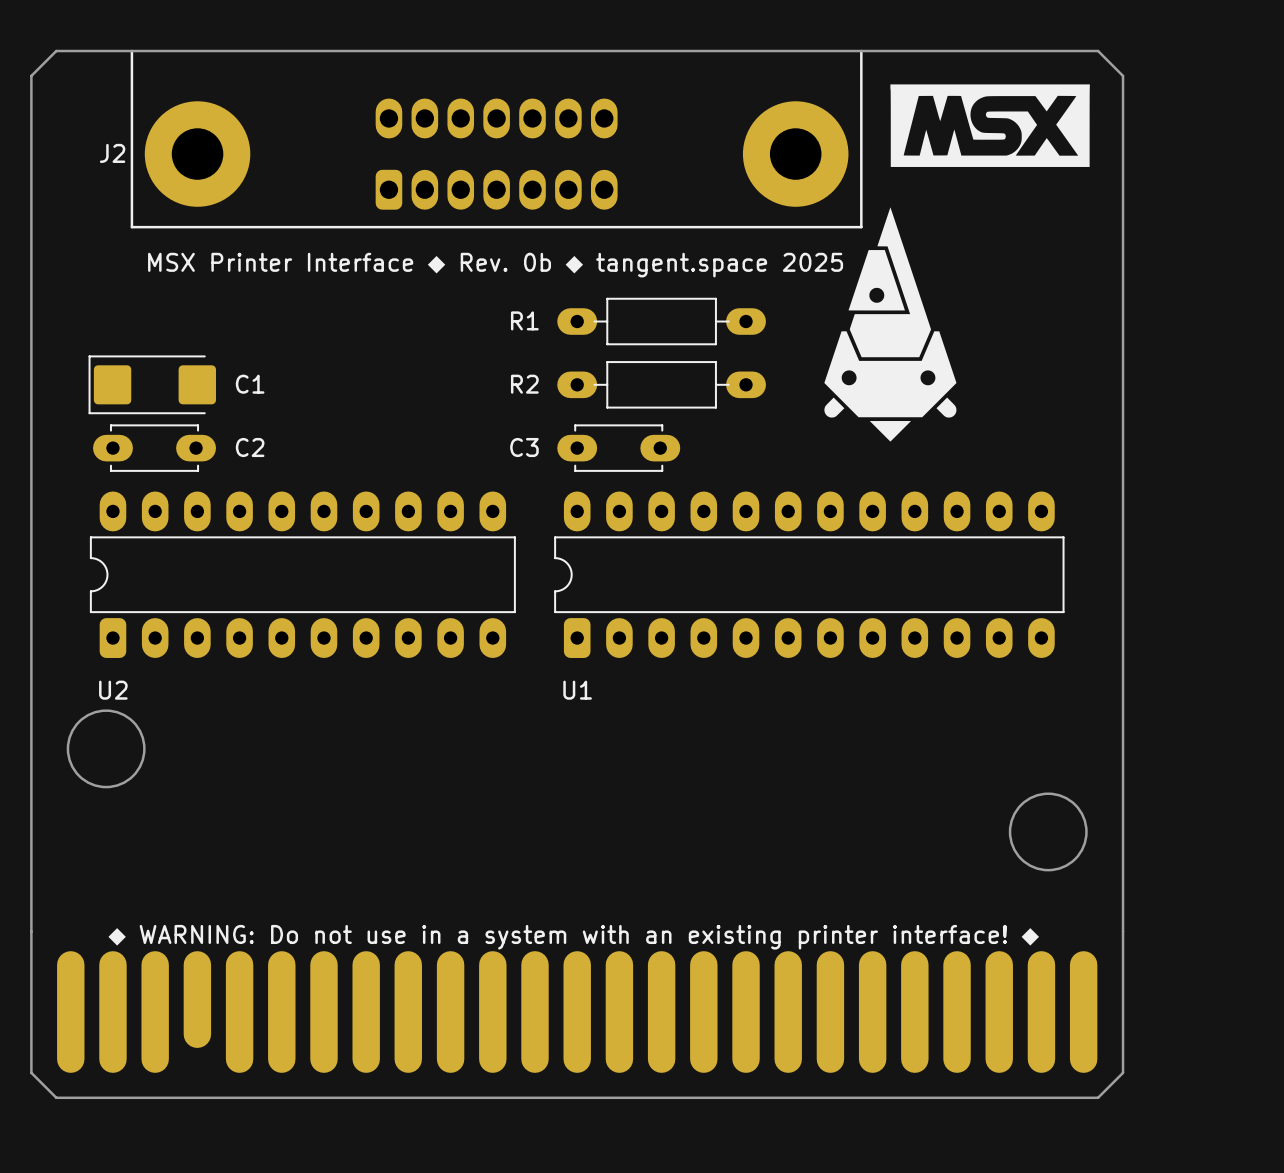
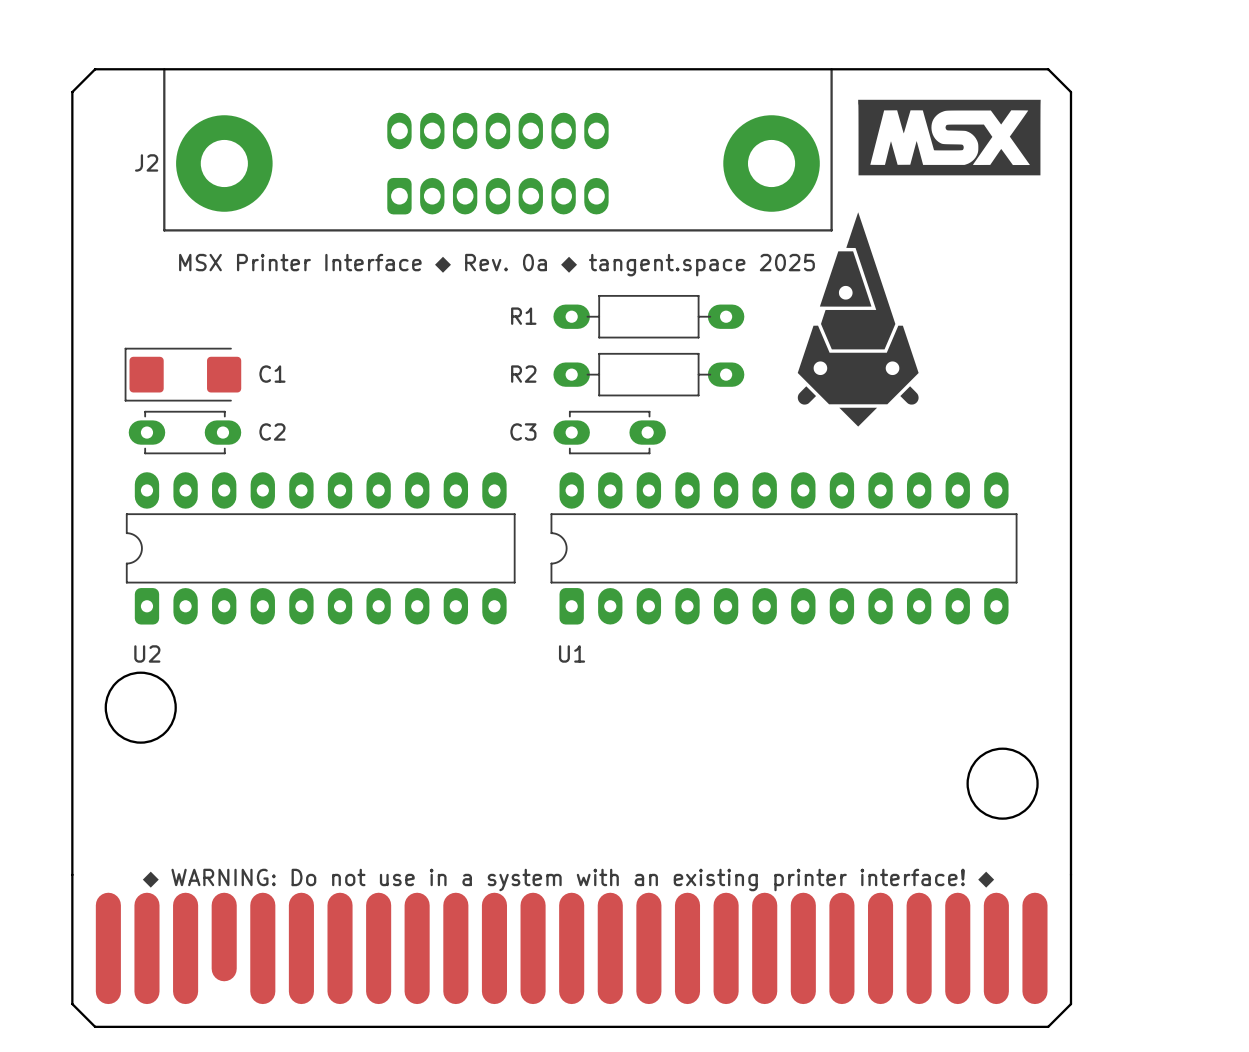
text: MSX Printer Interface ◆ Rev. 0b ◆ tangent.space 2025 (495, 265) -> MSX Printer Interface ◆ Rev. 0a ◆ tangent.space 2025 (496, 265)

